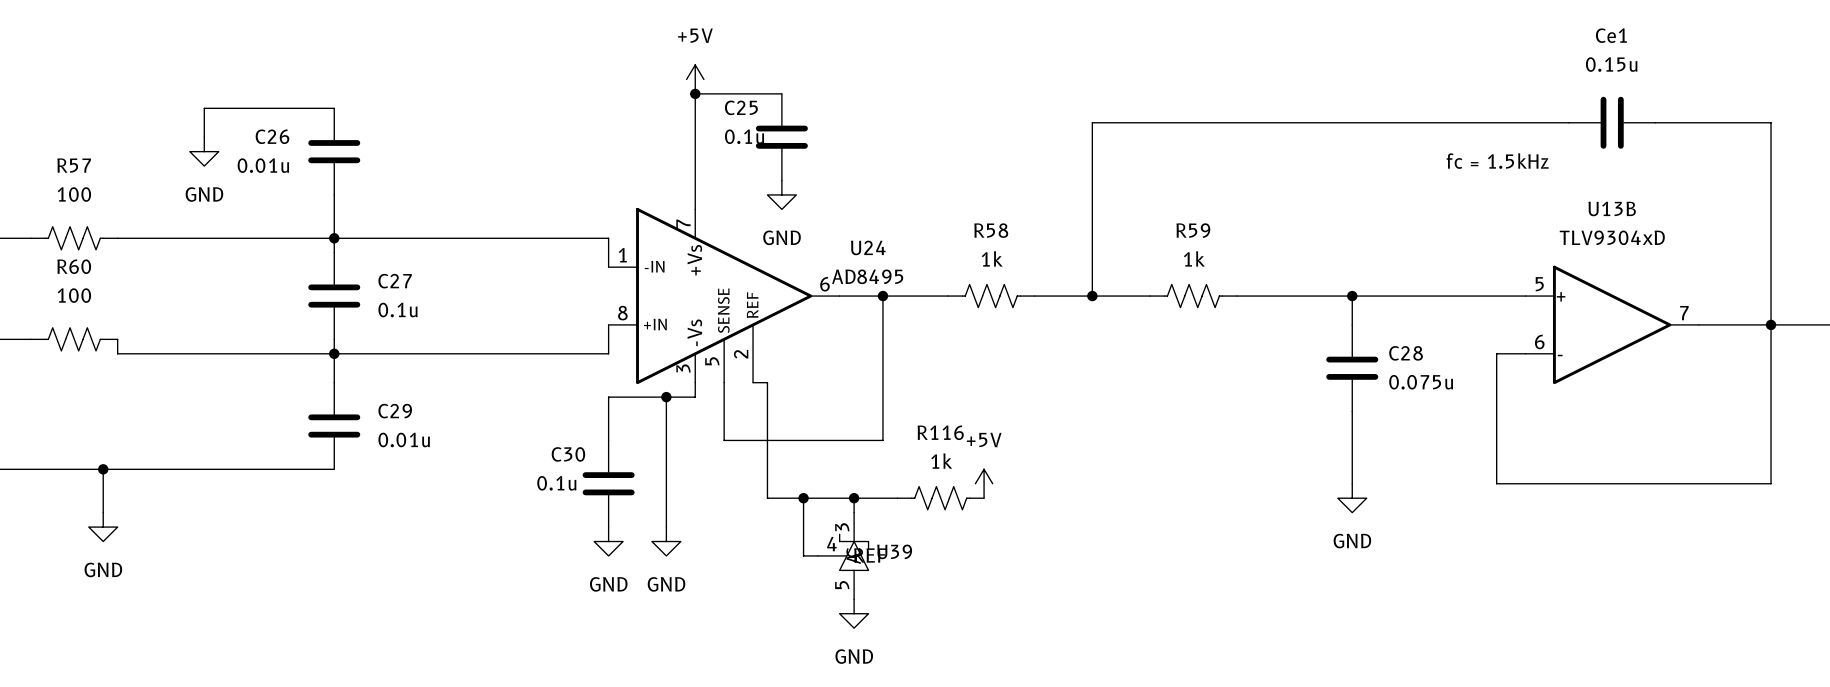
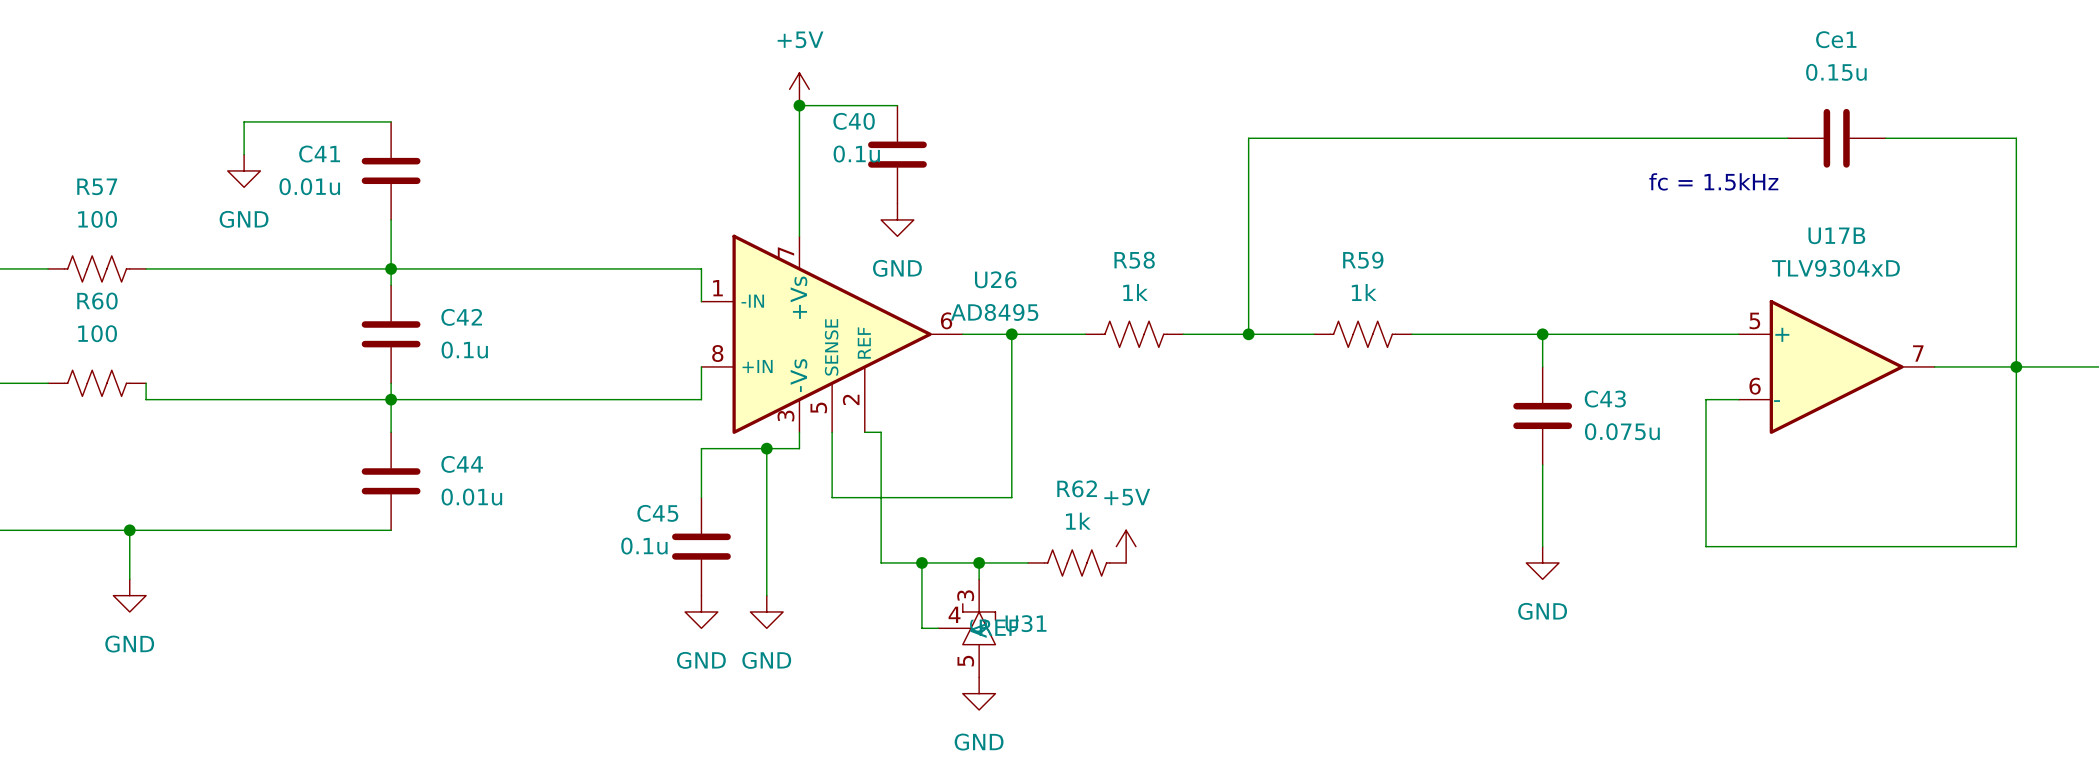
C25 name: C25 (741, 107) -> C40 (854, 121)
C26 name: C26 (272, 136) -> C41 (319, 154)
U13B name: U13B (1612, 208) -> U17B (1836, 235)
U24 name: U24 (868, 247) -> U26 (995, 279)
C27 name: C27 (395, 281) -> C42 (461, 317)
C28 name: C28 (1406, 353) -> C43 (1605, 399)
C29 name: C29 (395, 411) -> C44 (462, 464)
R116 name: R116 (940, 432) -> R62 (1077, 488)
C30 name: C30 (568, 454) -> C45 (657, 513)
U39 name: U39 (894, 551) -> U31 (1026, 623)

